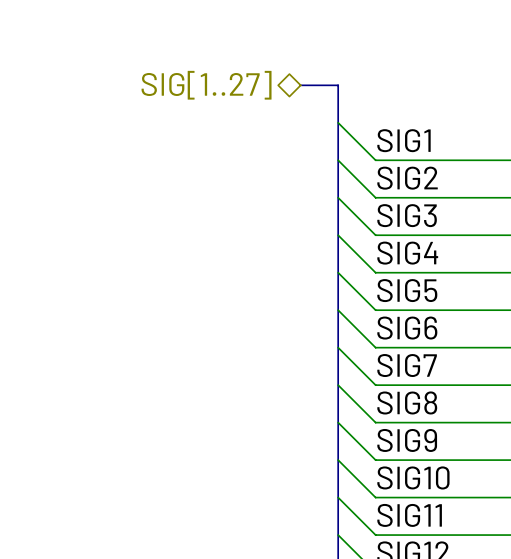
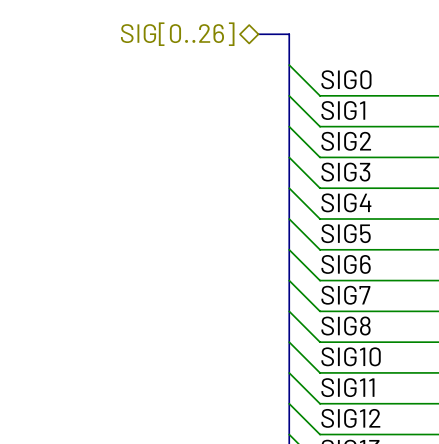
hierarchical label: SIG[1..27] (206, 85) -> SIG[0..26] (177, 34)
label: SIG1 (403, 140) -> SIG0 (346, 79)
label: SIG2 (407, 178) -> SIG1 (343, 110)
label: SIG3 (407, 215) -> SIG2 (346, 141)
label: SIG4 (407, 253) -> SIG3 (345, 172)
label: SIG5 (407, 290) -> SIG4 (346, 202)
label: SIG6 (407, 328) -> SIG5 (346, 233)
label: SIG7 (407, 365) -> SIG6 (346, 264)
label: SIG8 (407, 402) -> SIG7 (345, 295)
label: SIG9 (407, 440) -> SIG8 (346, 326)

